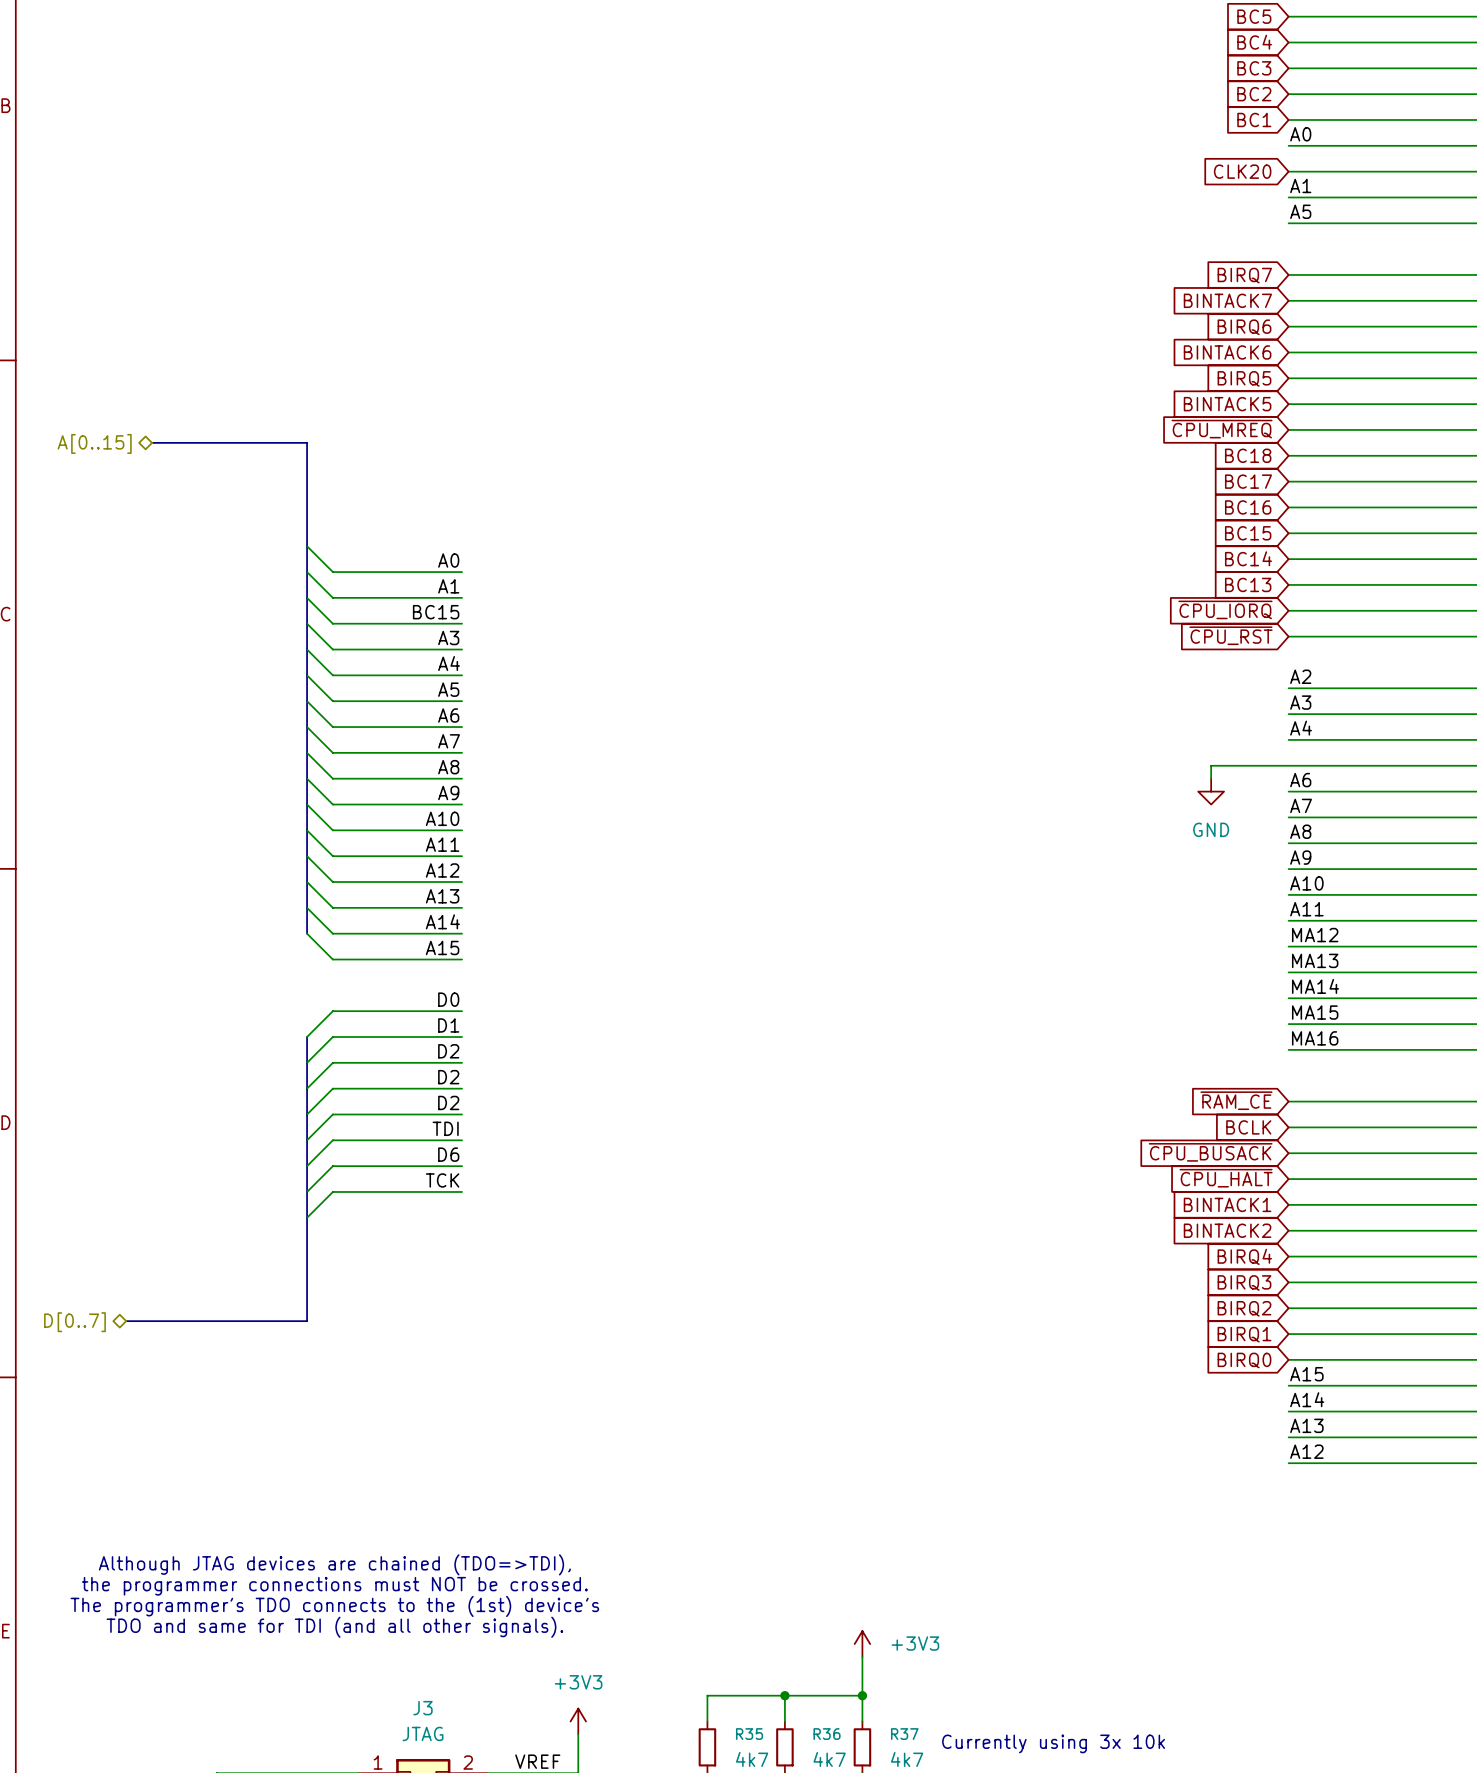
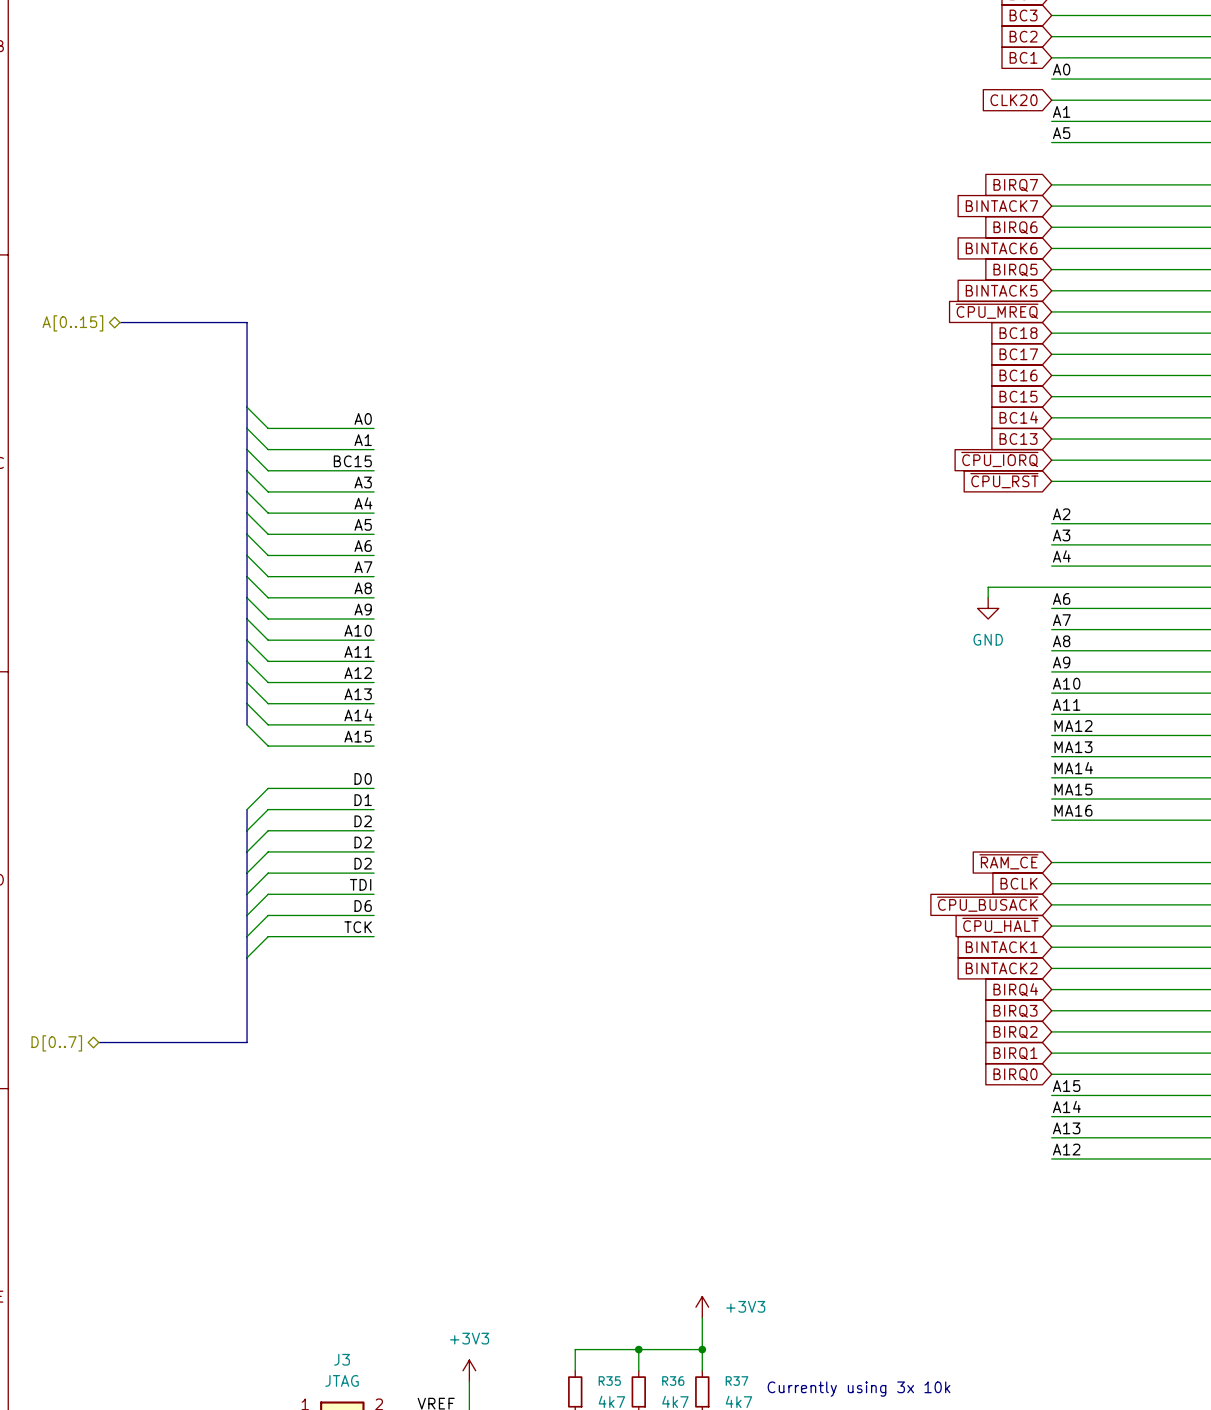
text: Although JTAG devices are chained (TDO=>TDI), (334, 1564) -> none
text: the programmer connections must NOT be crossed. (334, 1586) -> none
text: The programmer's TDO connects to the (1st) device's (334, 1606) -> none
text: TDO and same for TDI (and all other signals). (334, 1627) -> none

